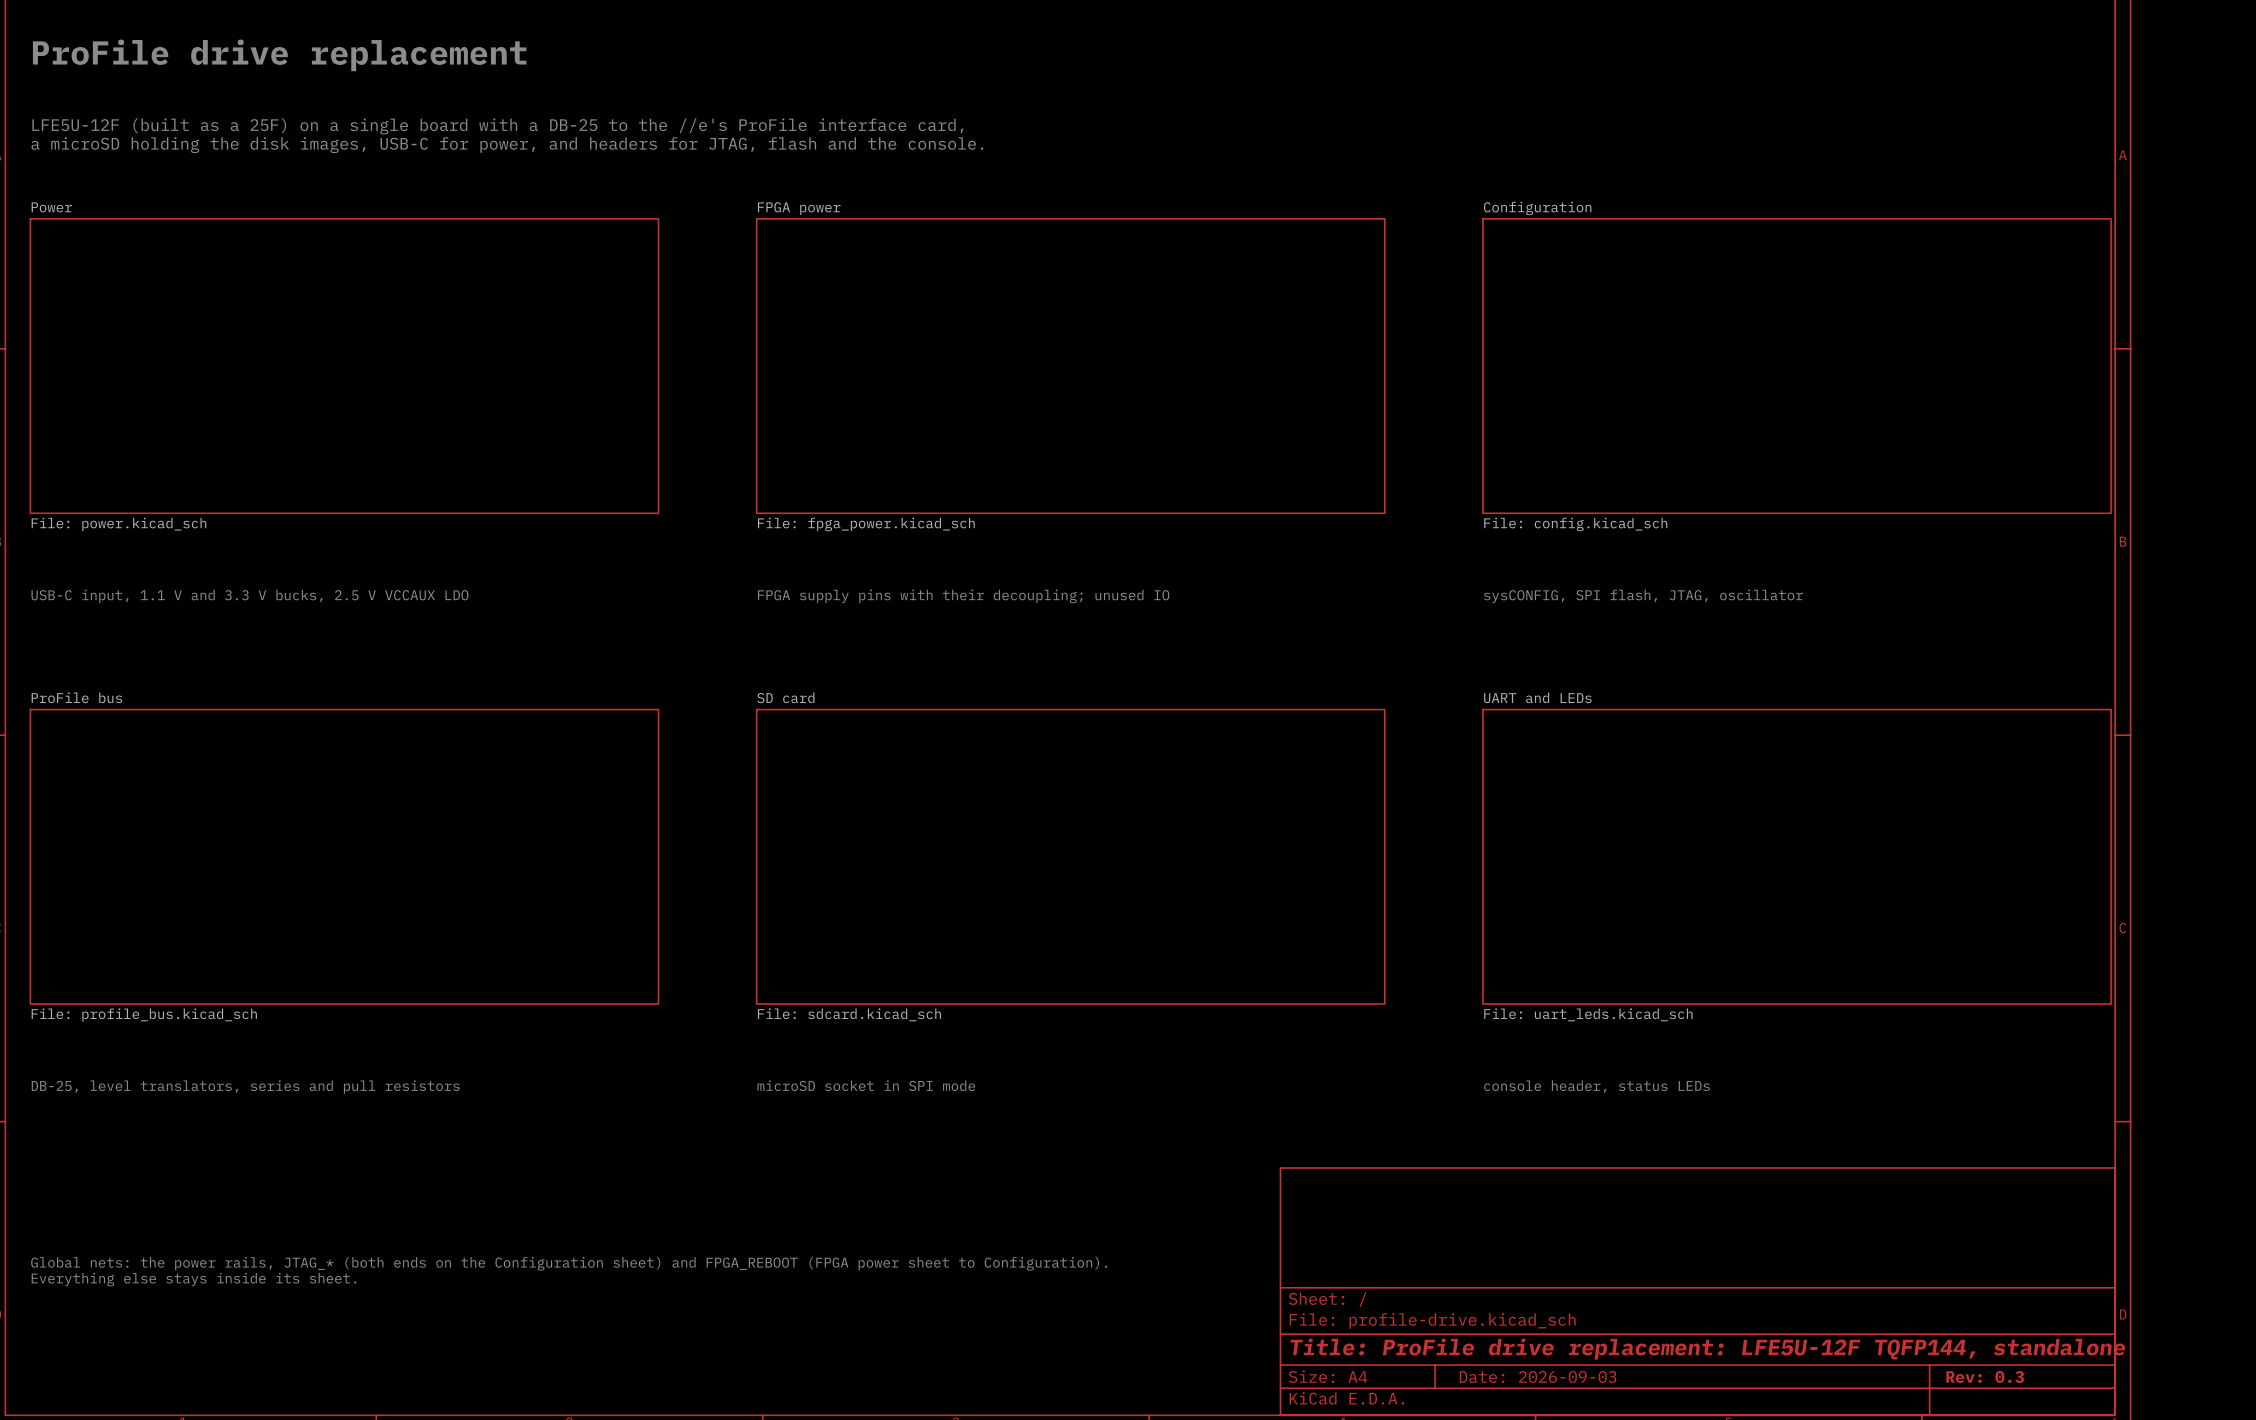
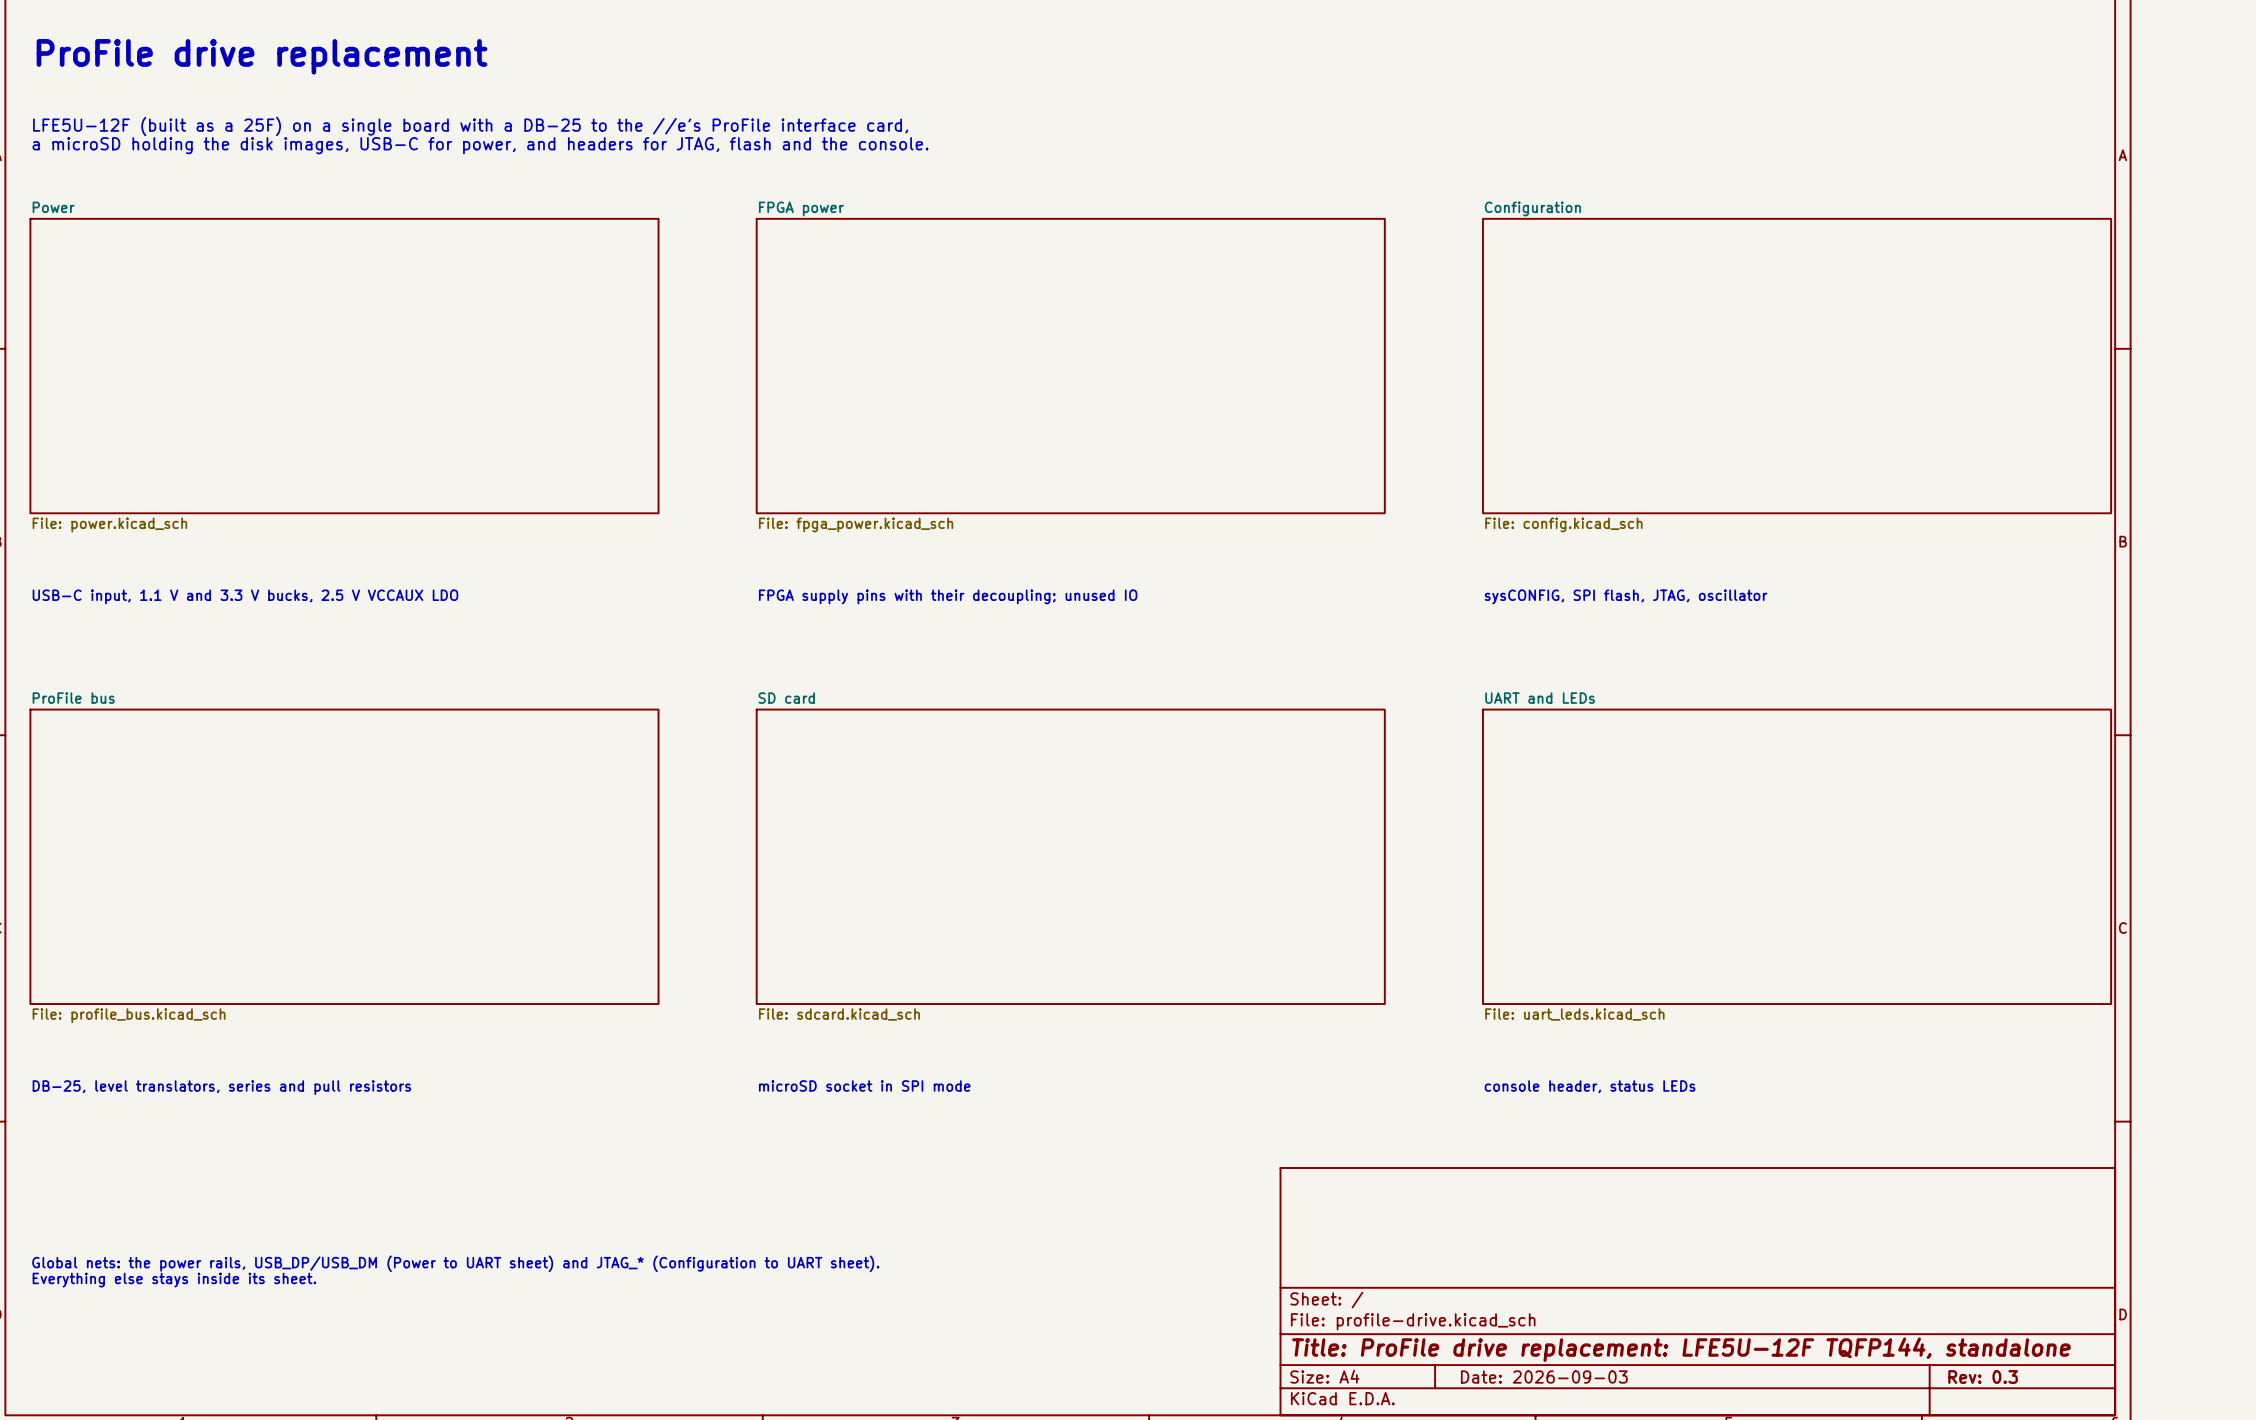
text: Global nets: the power rails, JTAG_* (both ends on the Configuration sheet) and FPGA_REBOOT (FPGA power sheet to Configuration). (569, 1263) -> Global nets: the power rails, USB_DP/USB_DM (Power to UART sheet) and JTAG_* (Configuration to UART sheet). (455, 1263)

